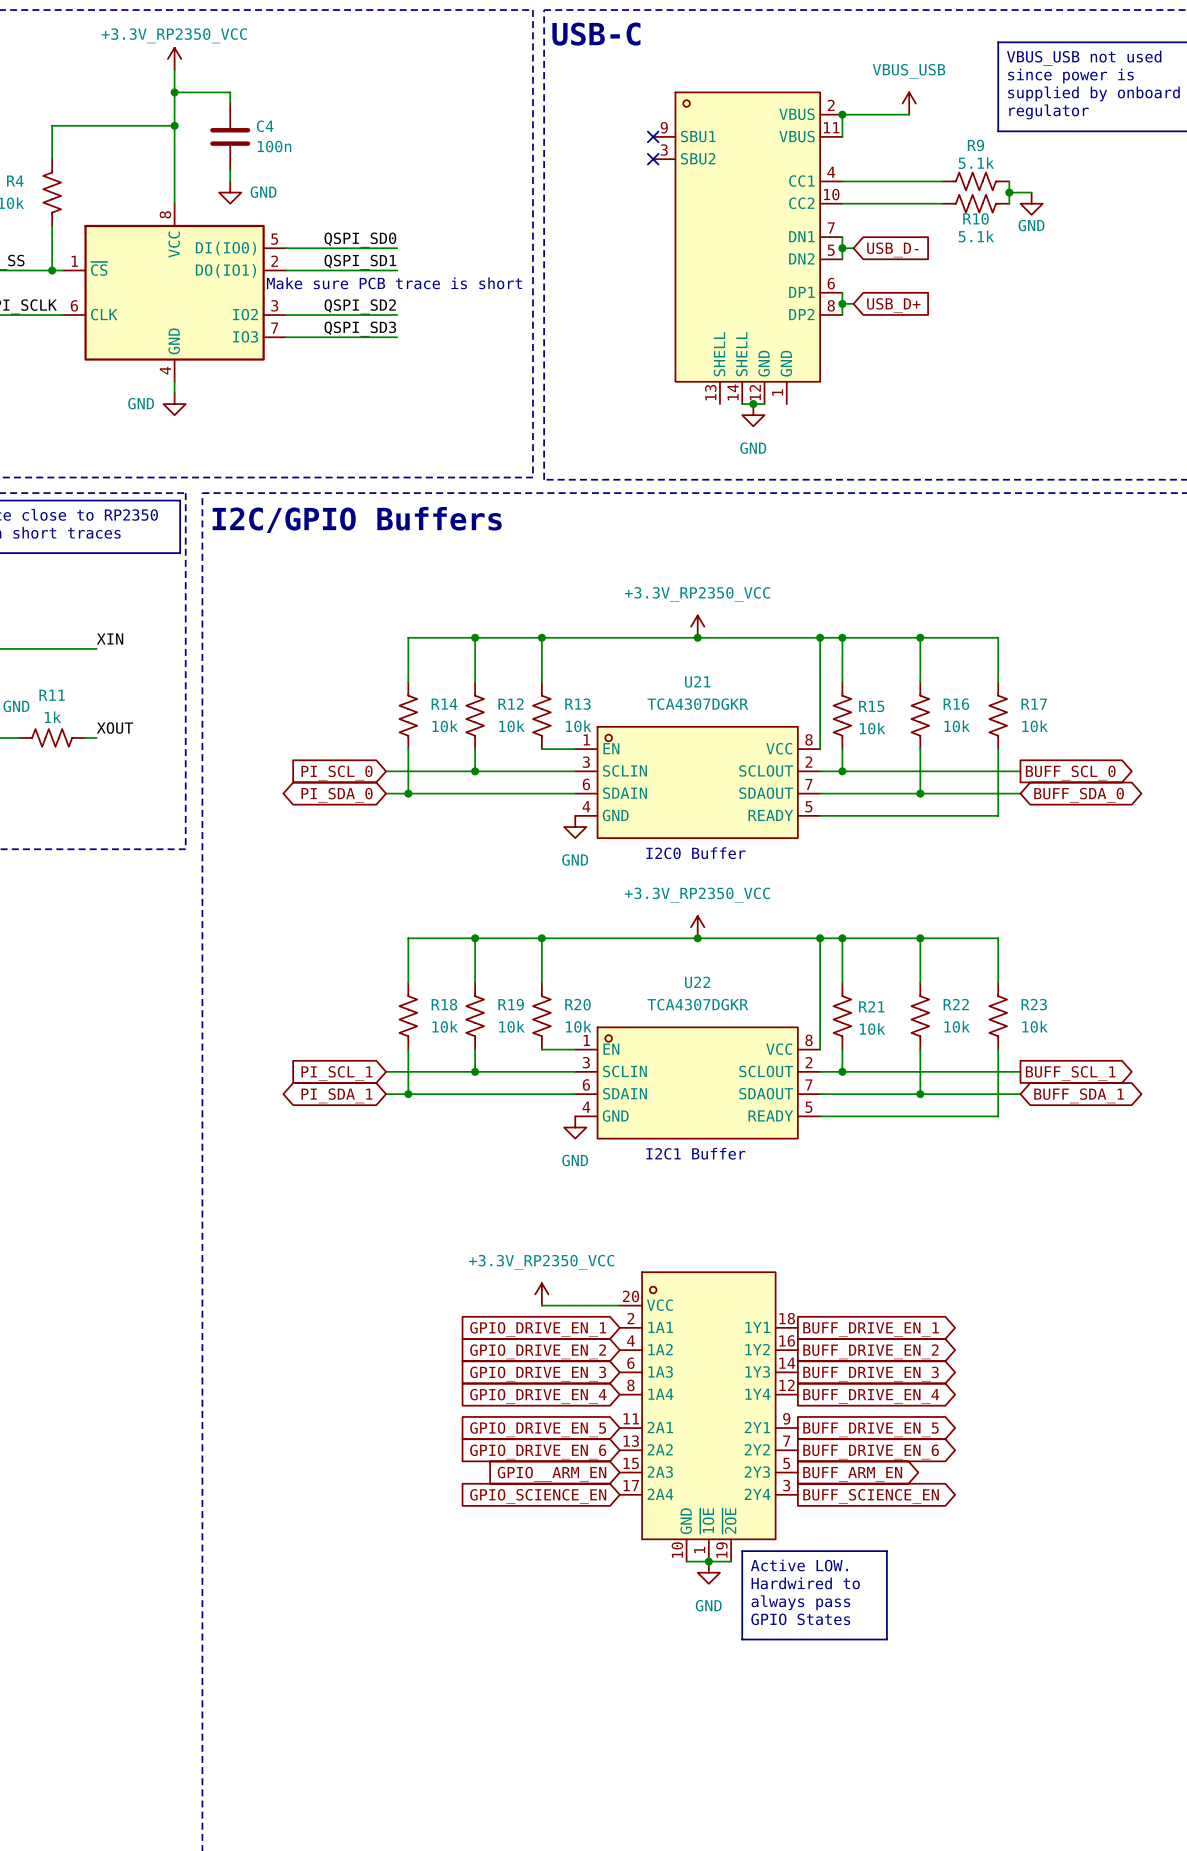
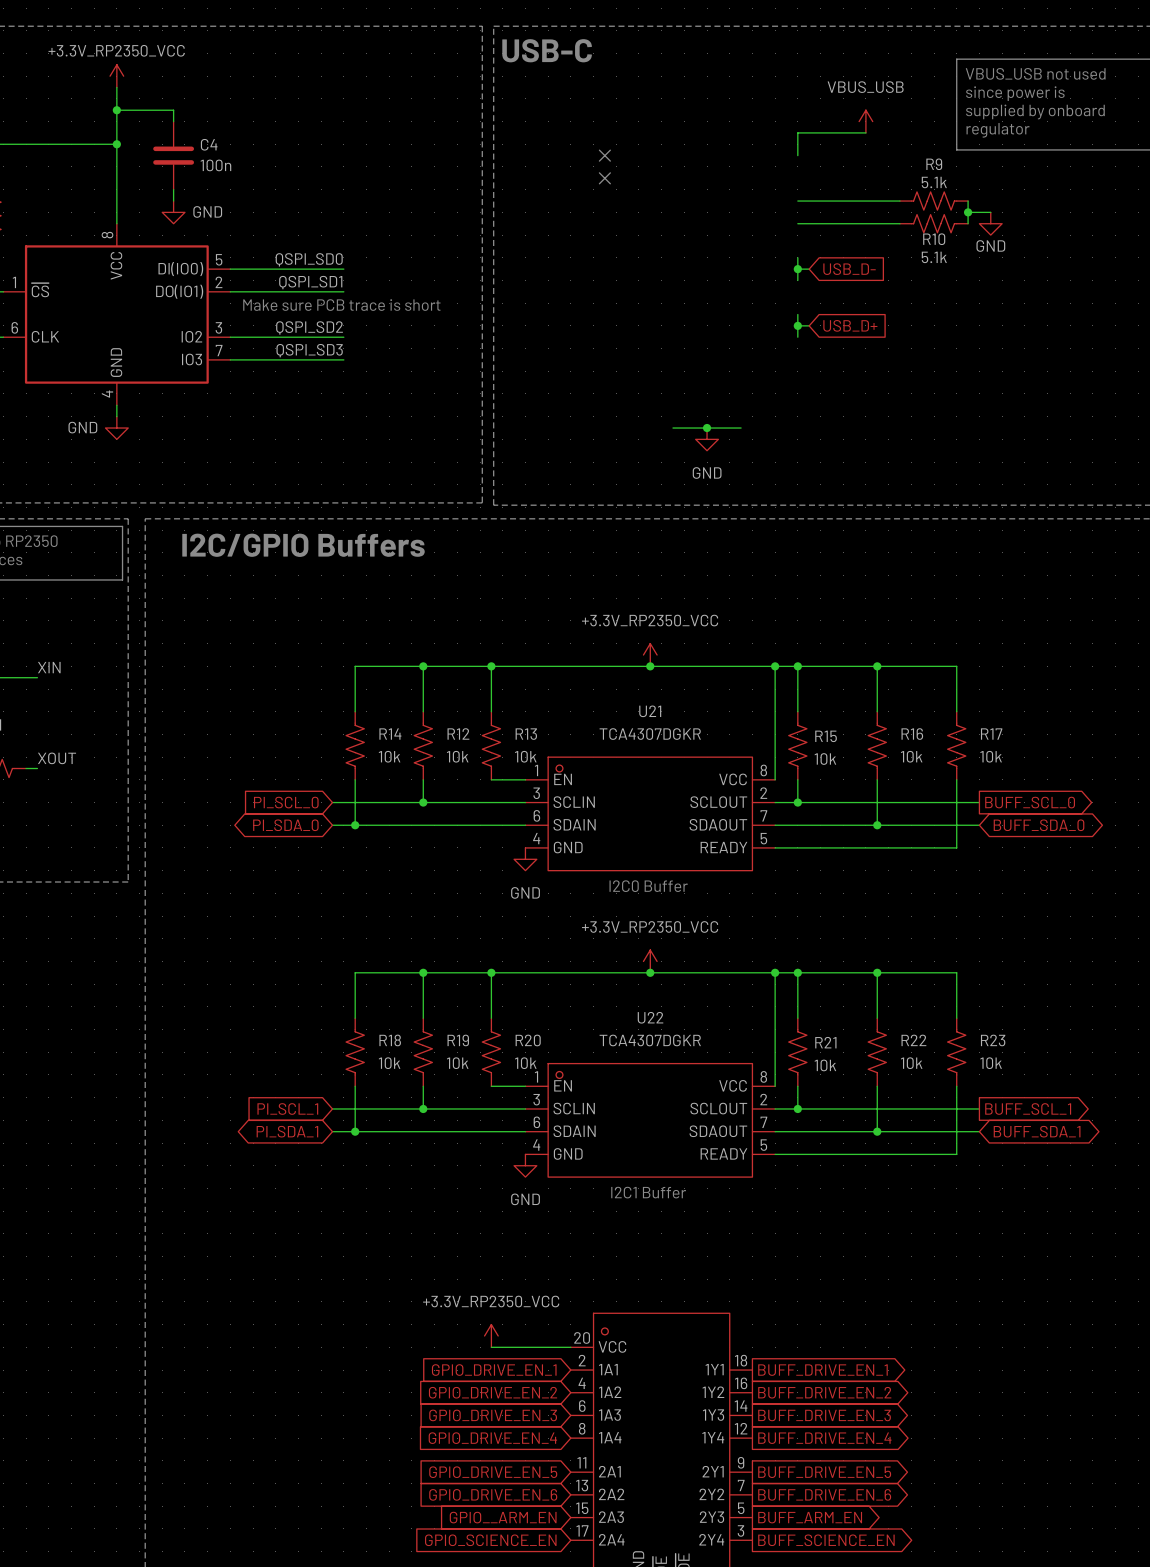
junction: (842, 114) -> none
part: (747, 248) -> none
wire: none -> (672, 428) (695, 428)
wire: none -> (718, 428) (741, 428)

